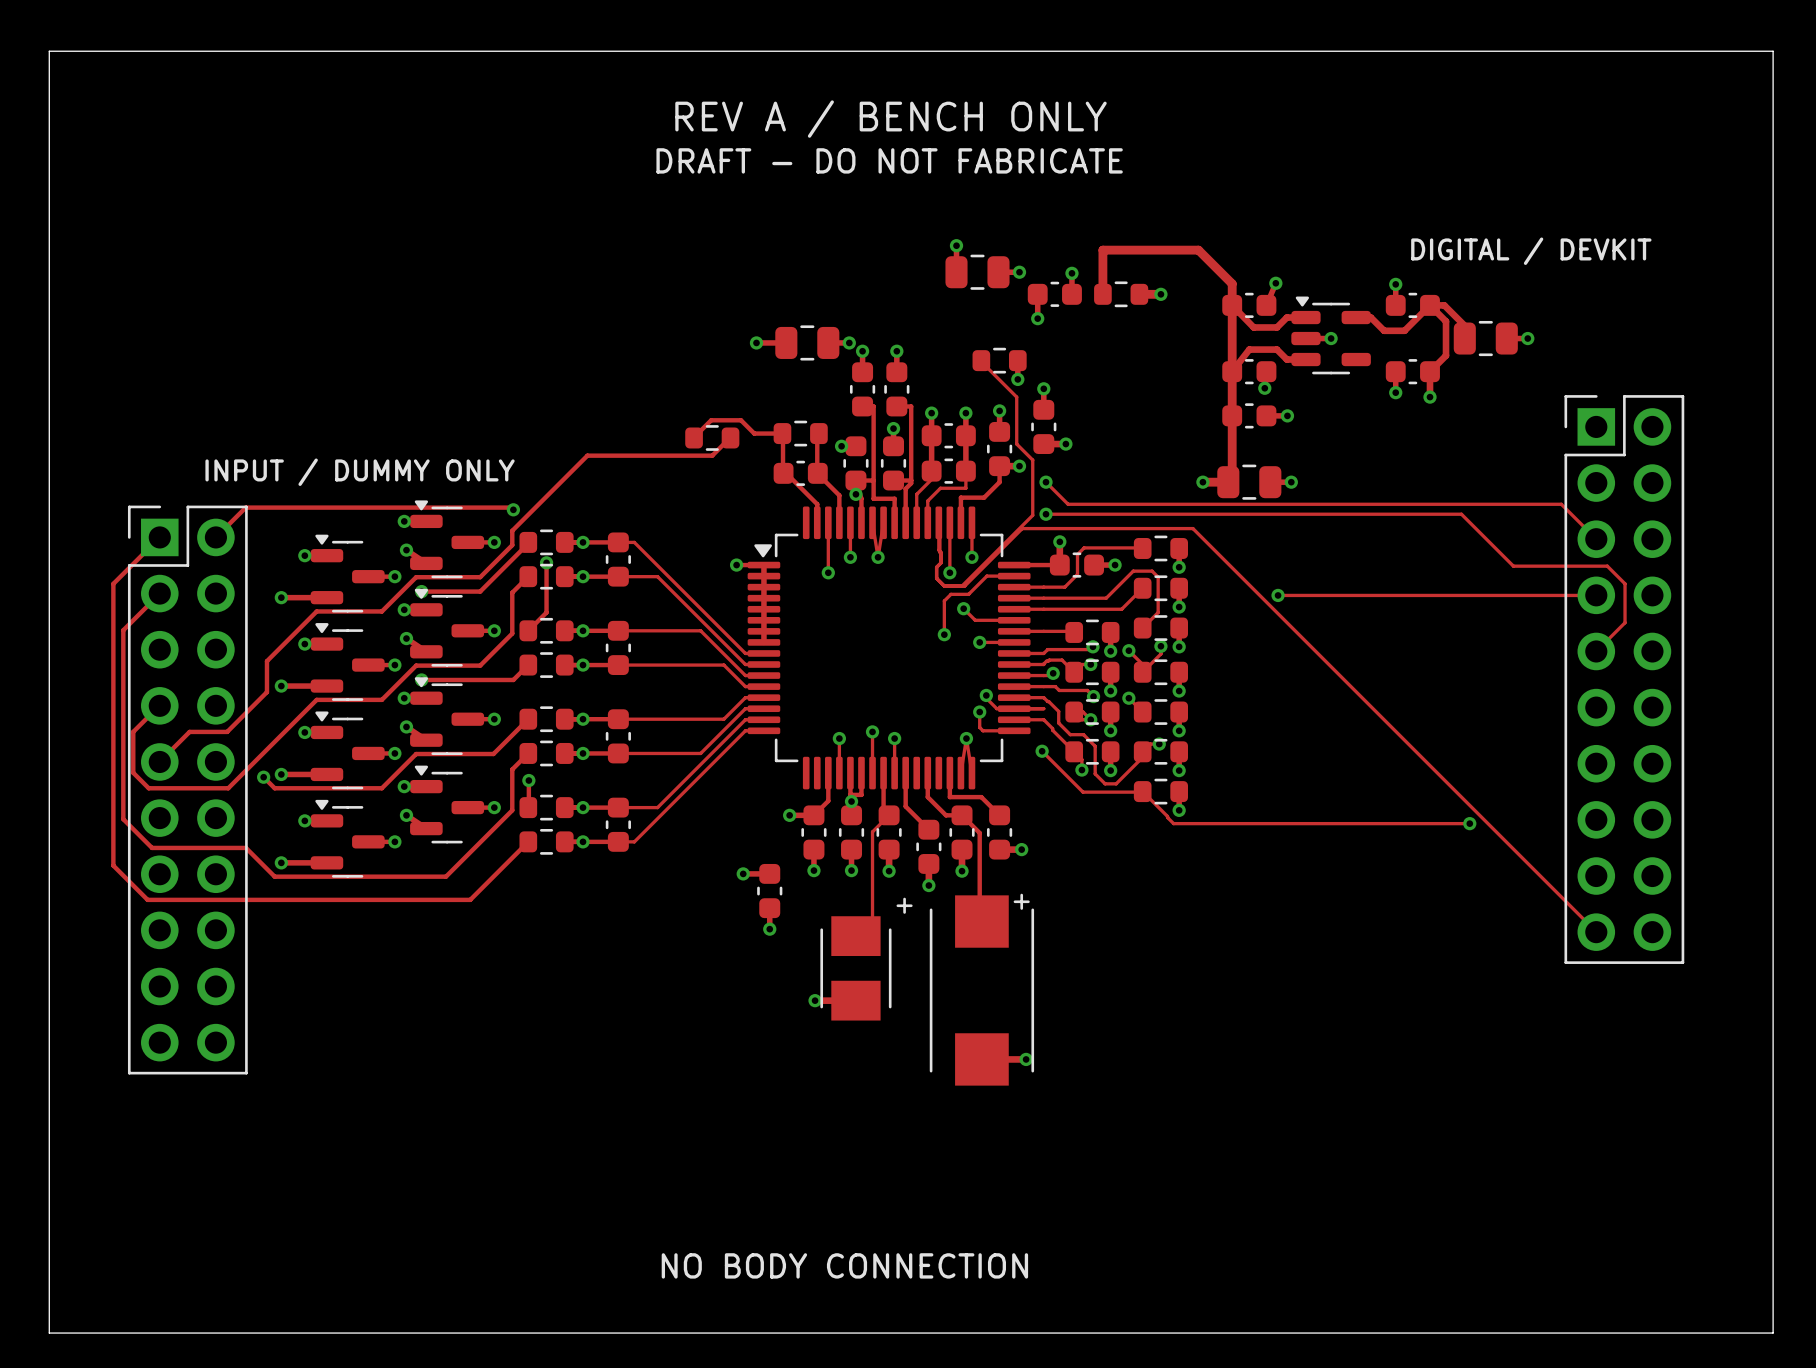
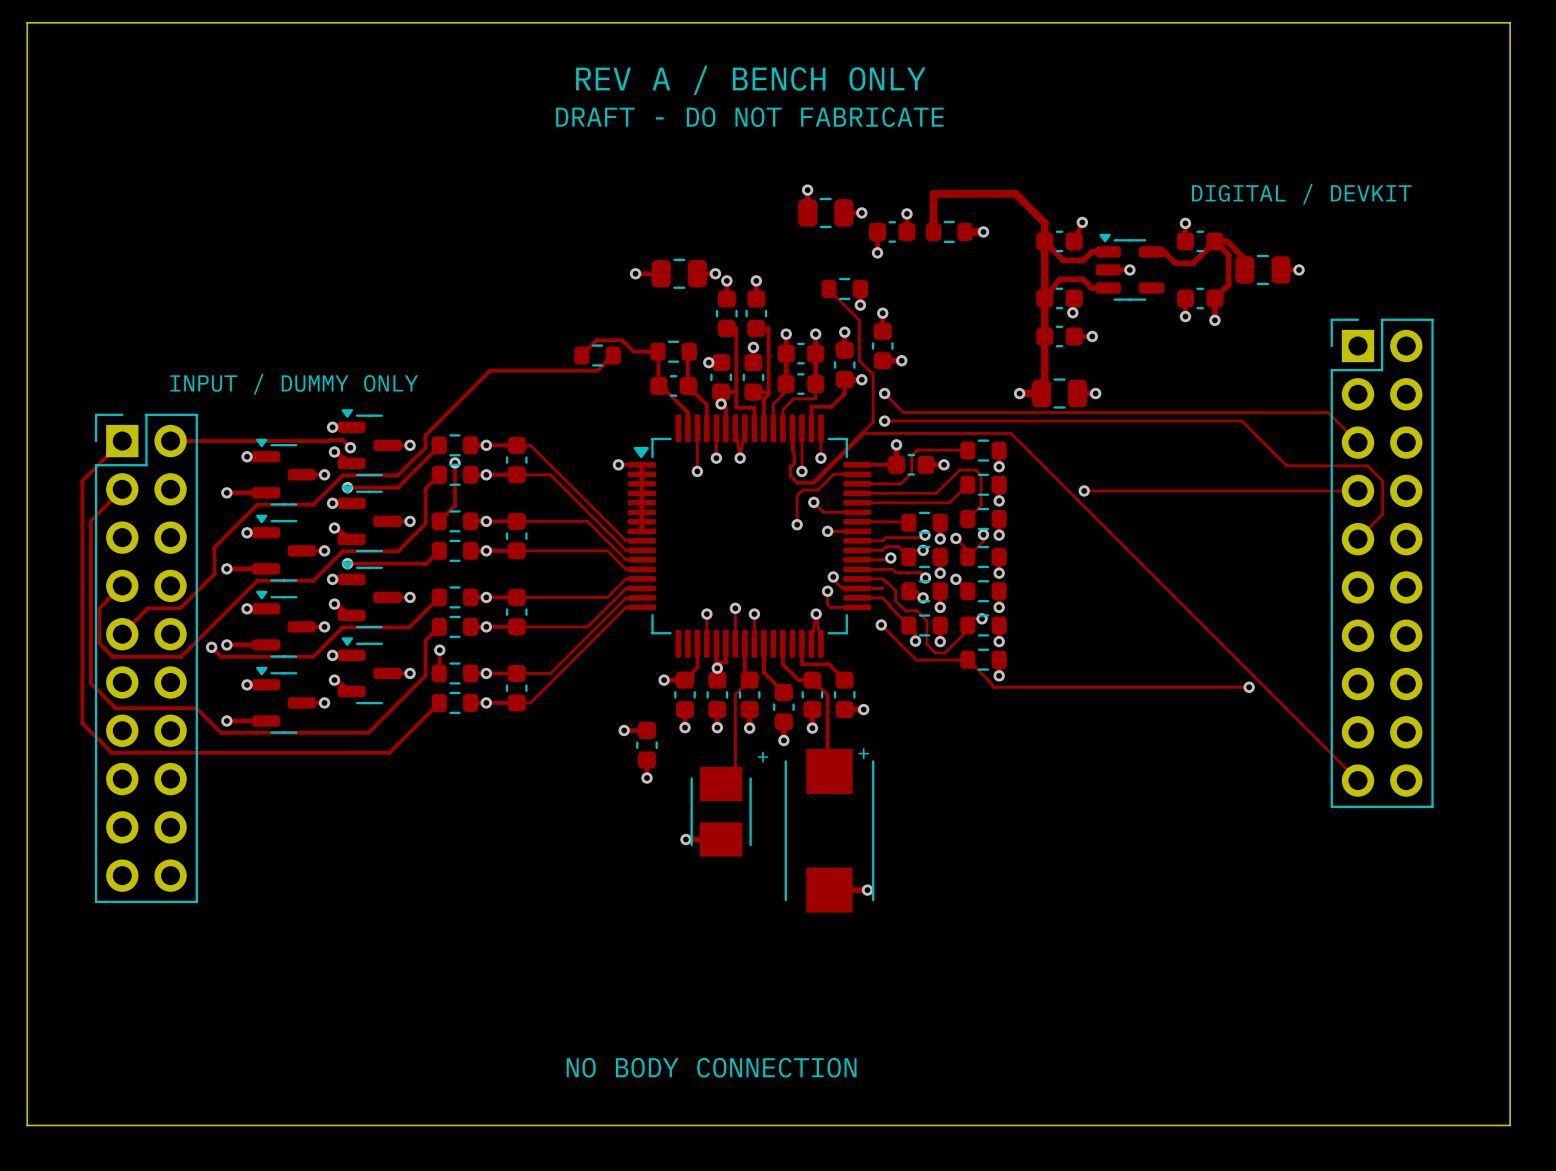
track: (513, 509) (511, 507) (245, 507) (215, 537) -> (350, 447) (342, 440) (170, 441)
via position: (513, 509) -> (350, 447)

